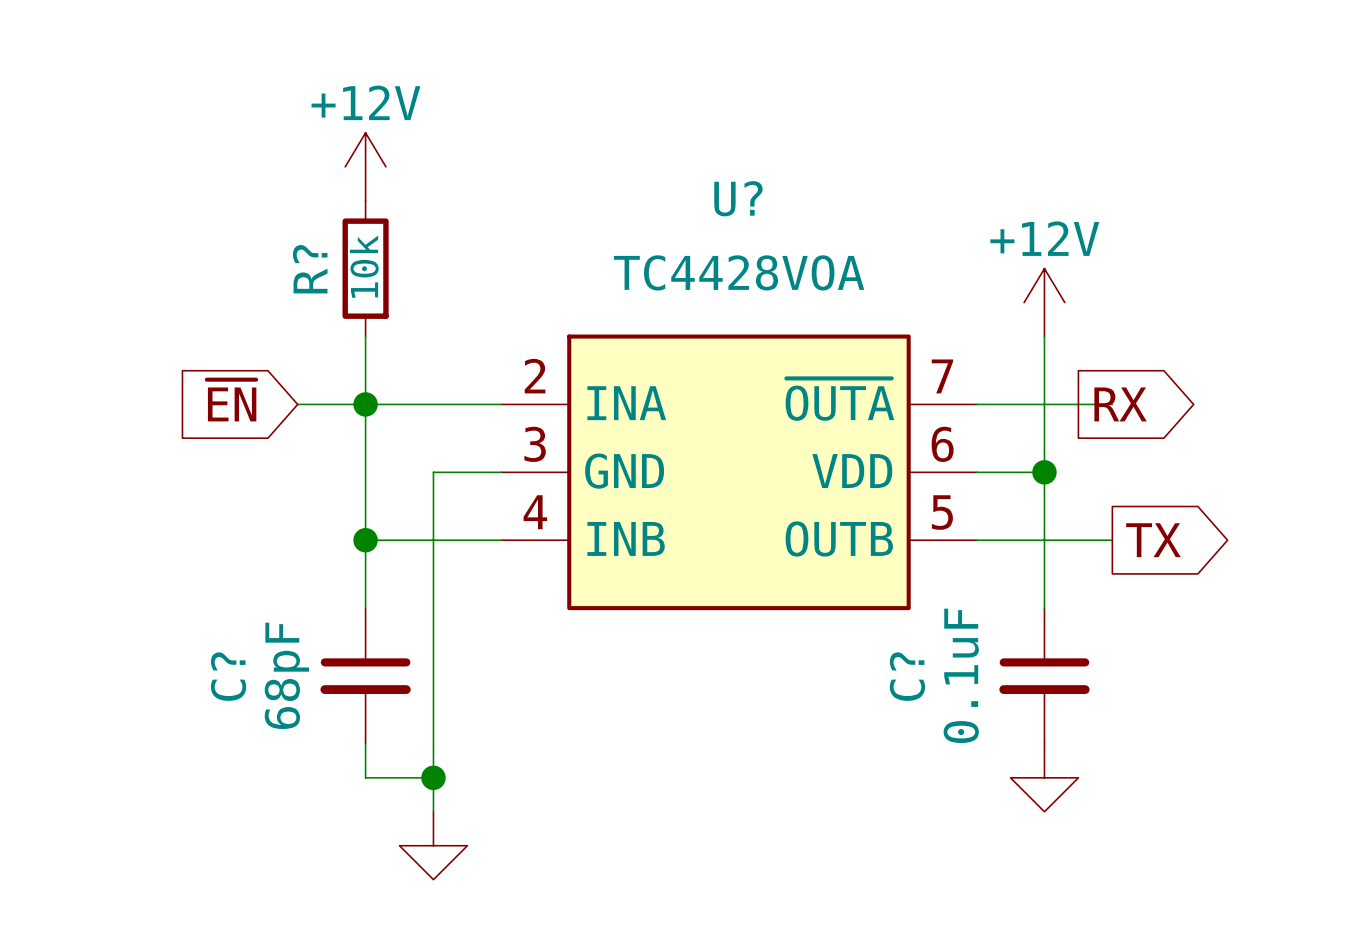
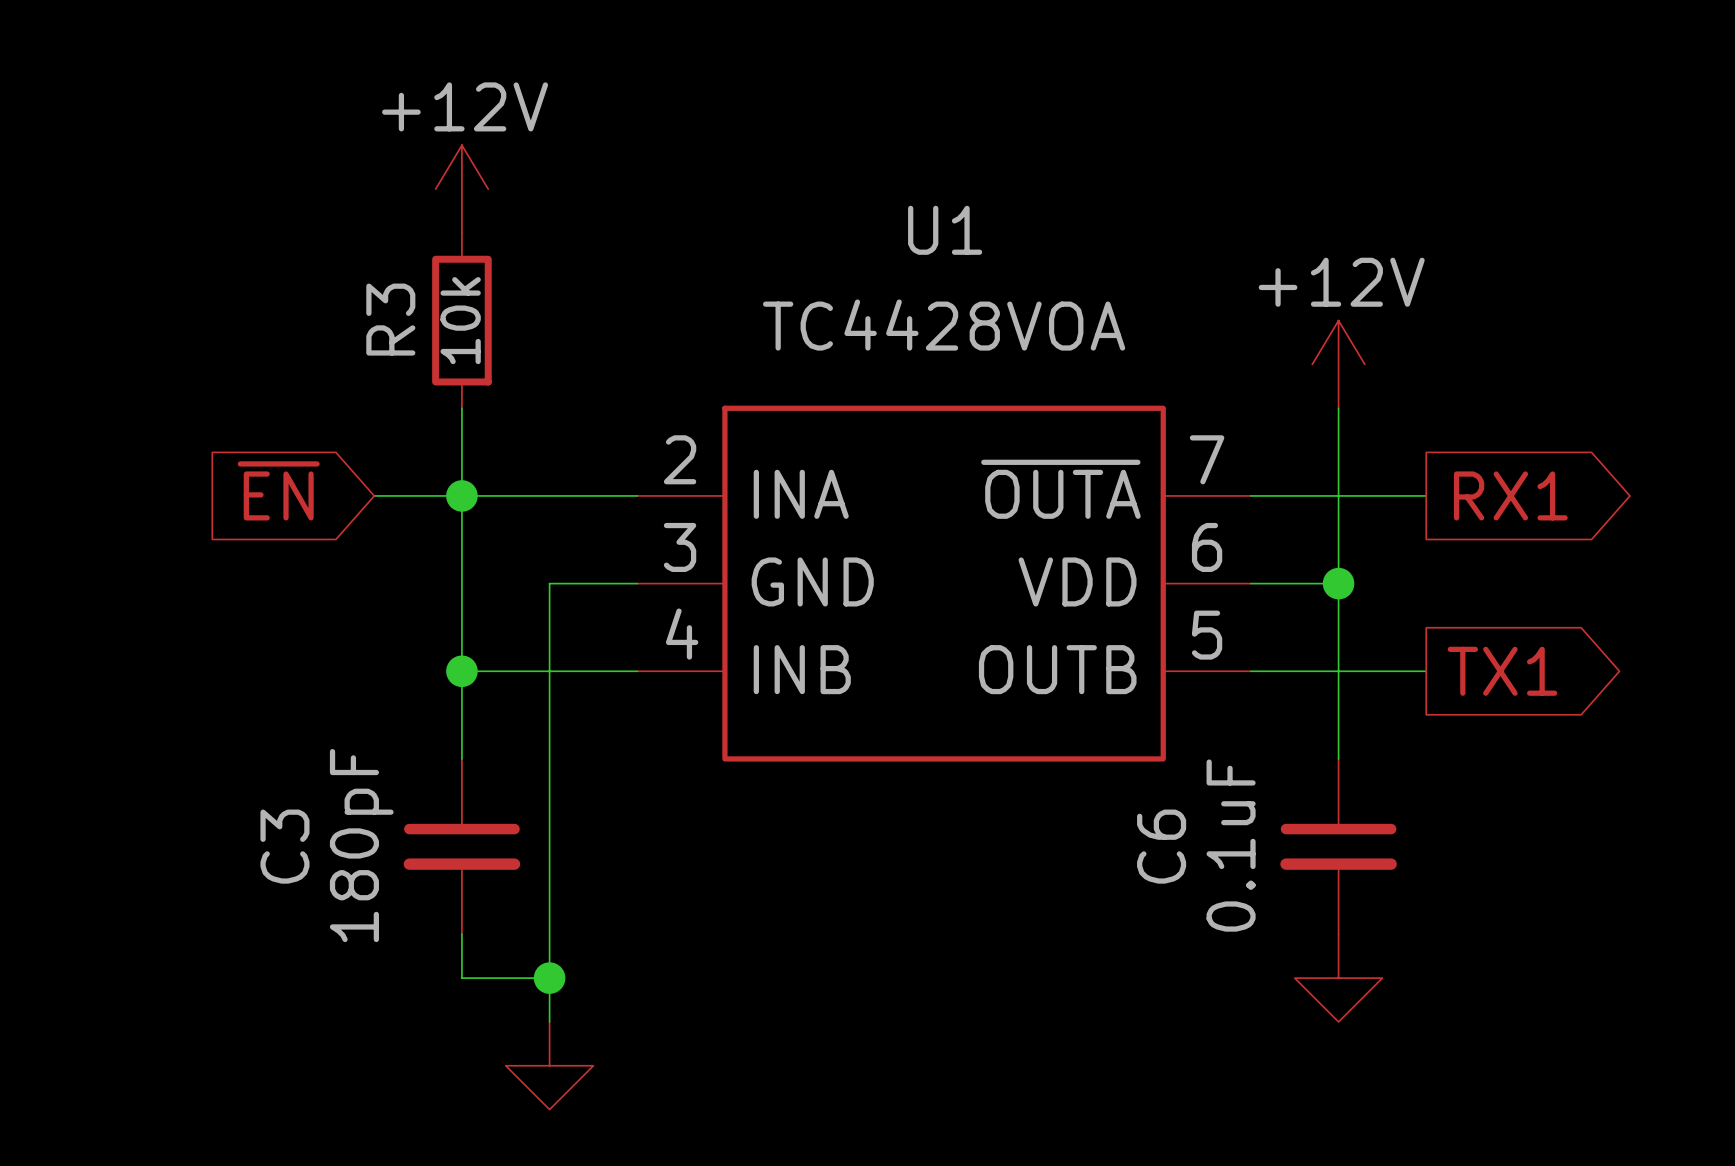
U? name: U? (738, 198) -> U1 (945, 230)
R? name: R? (310, 269) -> R3 (390, 319)
global label: RX (1120, 404) -> RX1 (1510, 495)
global label: TX (1153, 540) -> TX1 (1502, 671)
C? value: 68pF (286, 675) -> 180pF (361, 845)
C? name: C? (228, 676) -> C3 (284, 846)
C? name: C? (907, 676) -> C6 (1161, 846)

